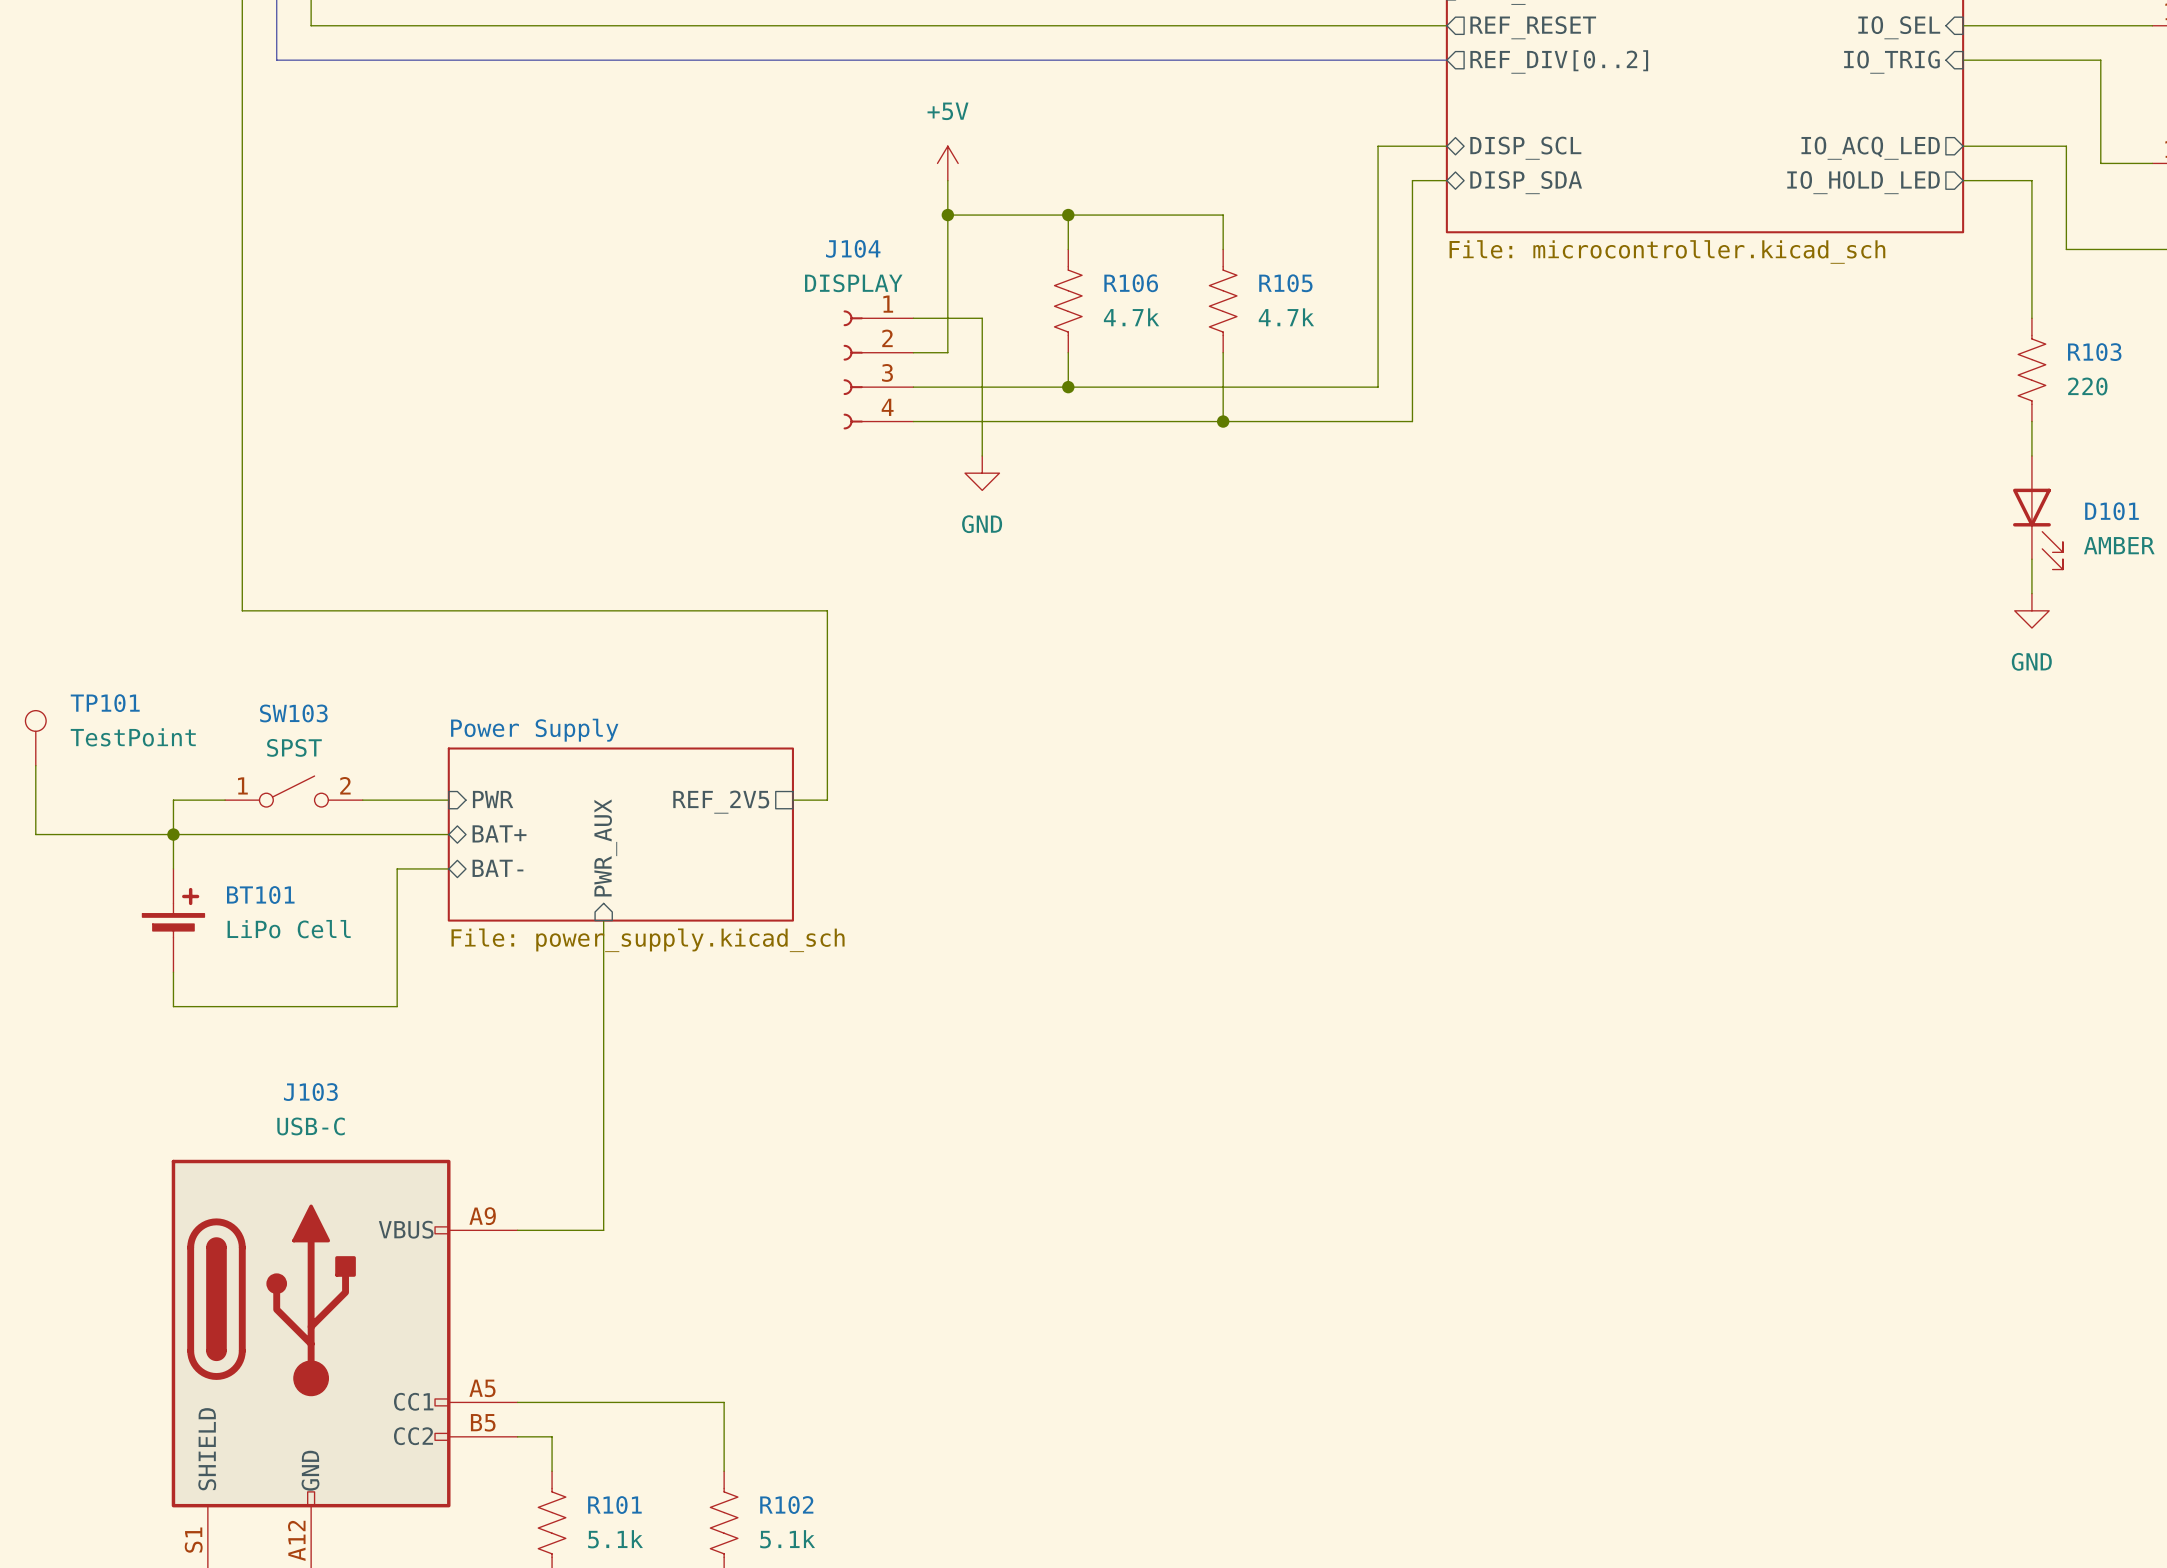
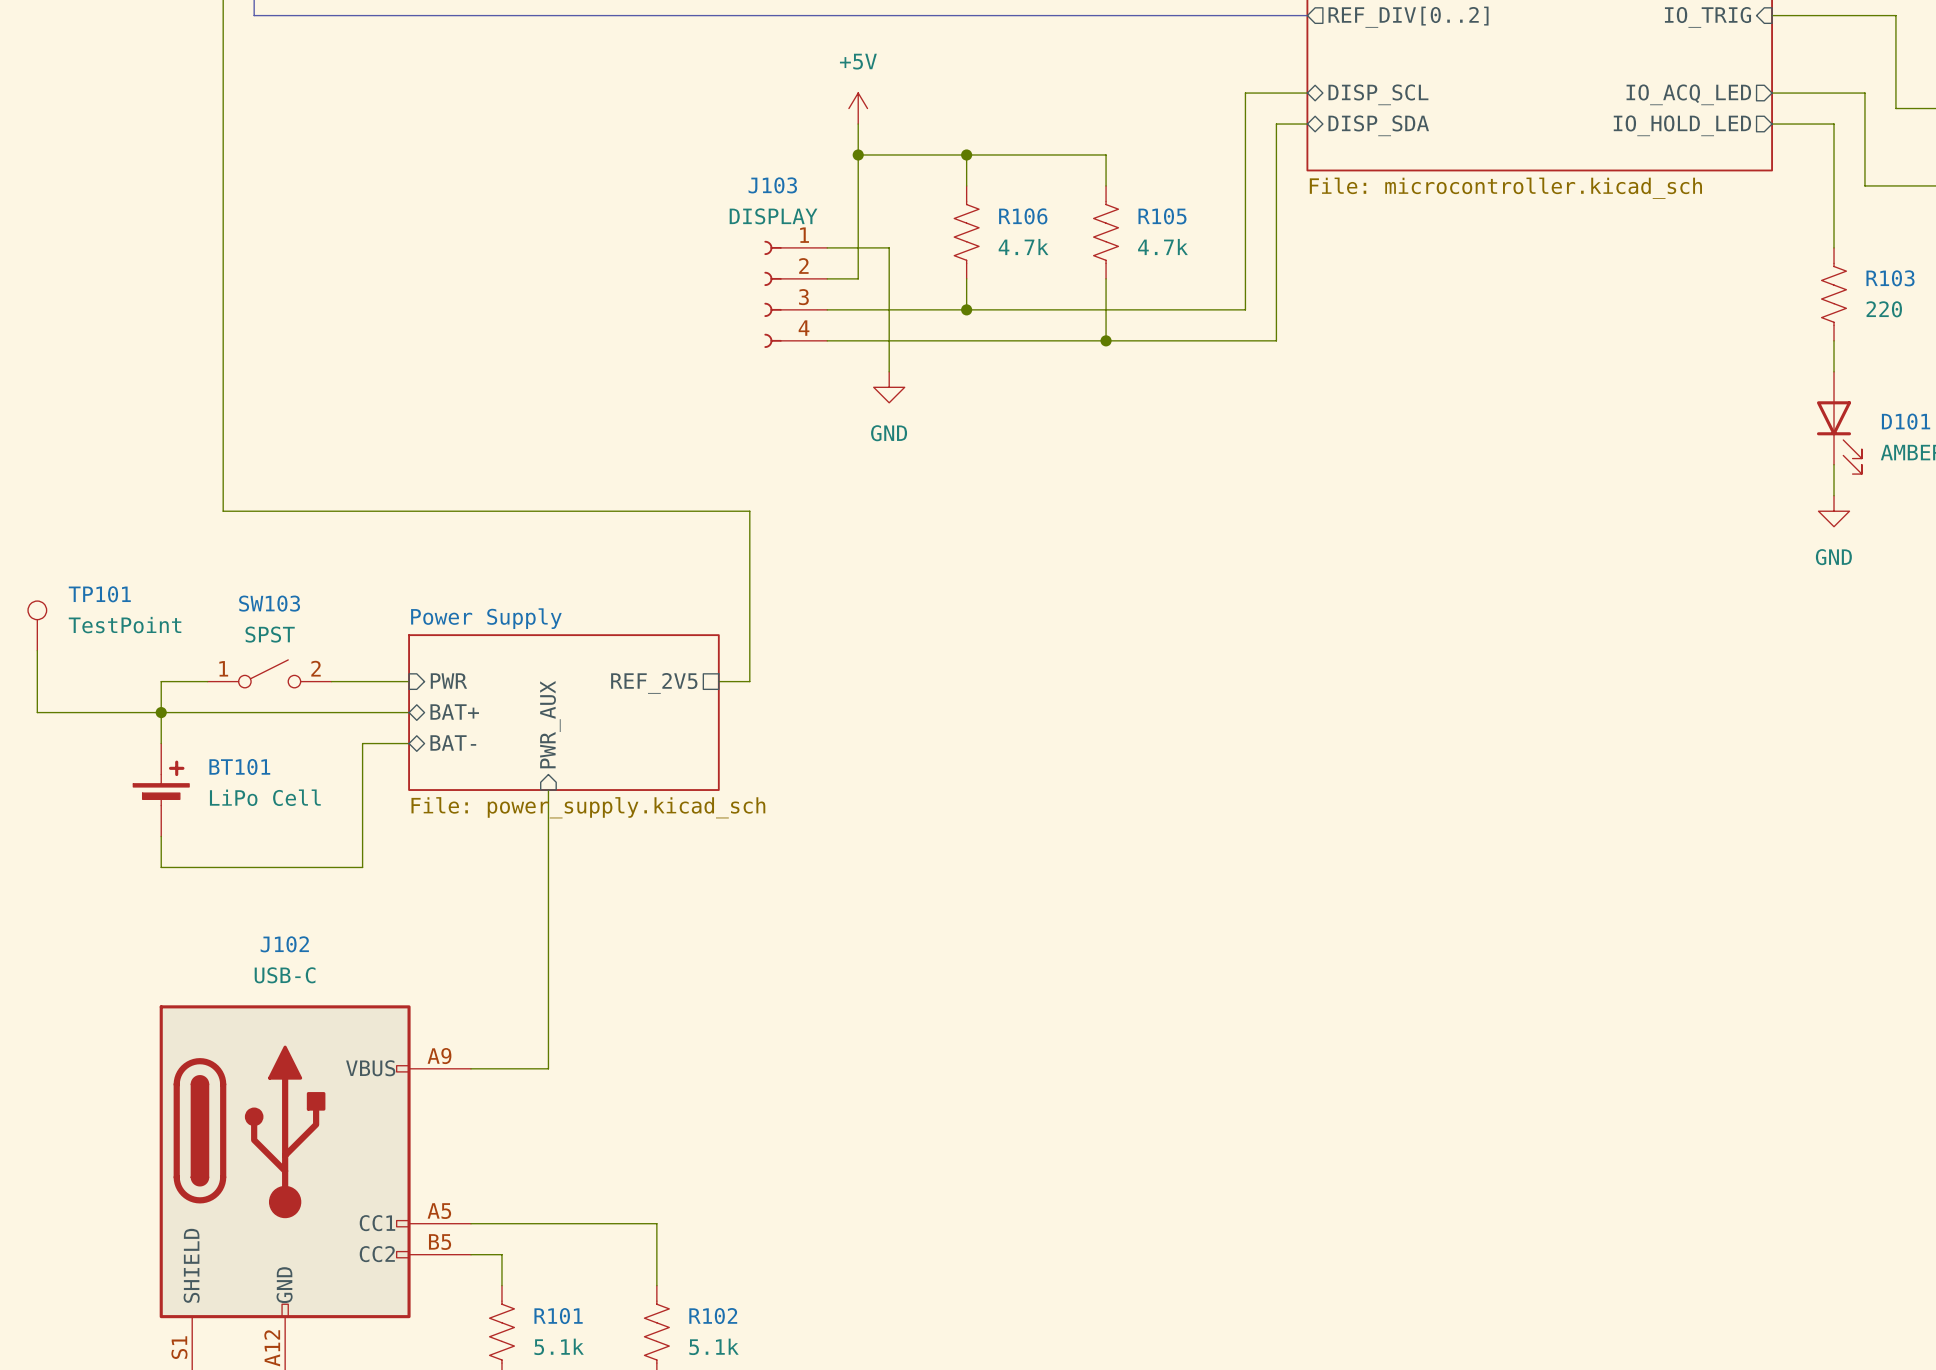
J104 name: J104 (853, 248) -> J103 (772, 185)
J103 name: J103 (310, 1092) -> J102 (284, 944)

